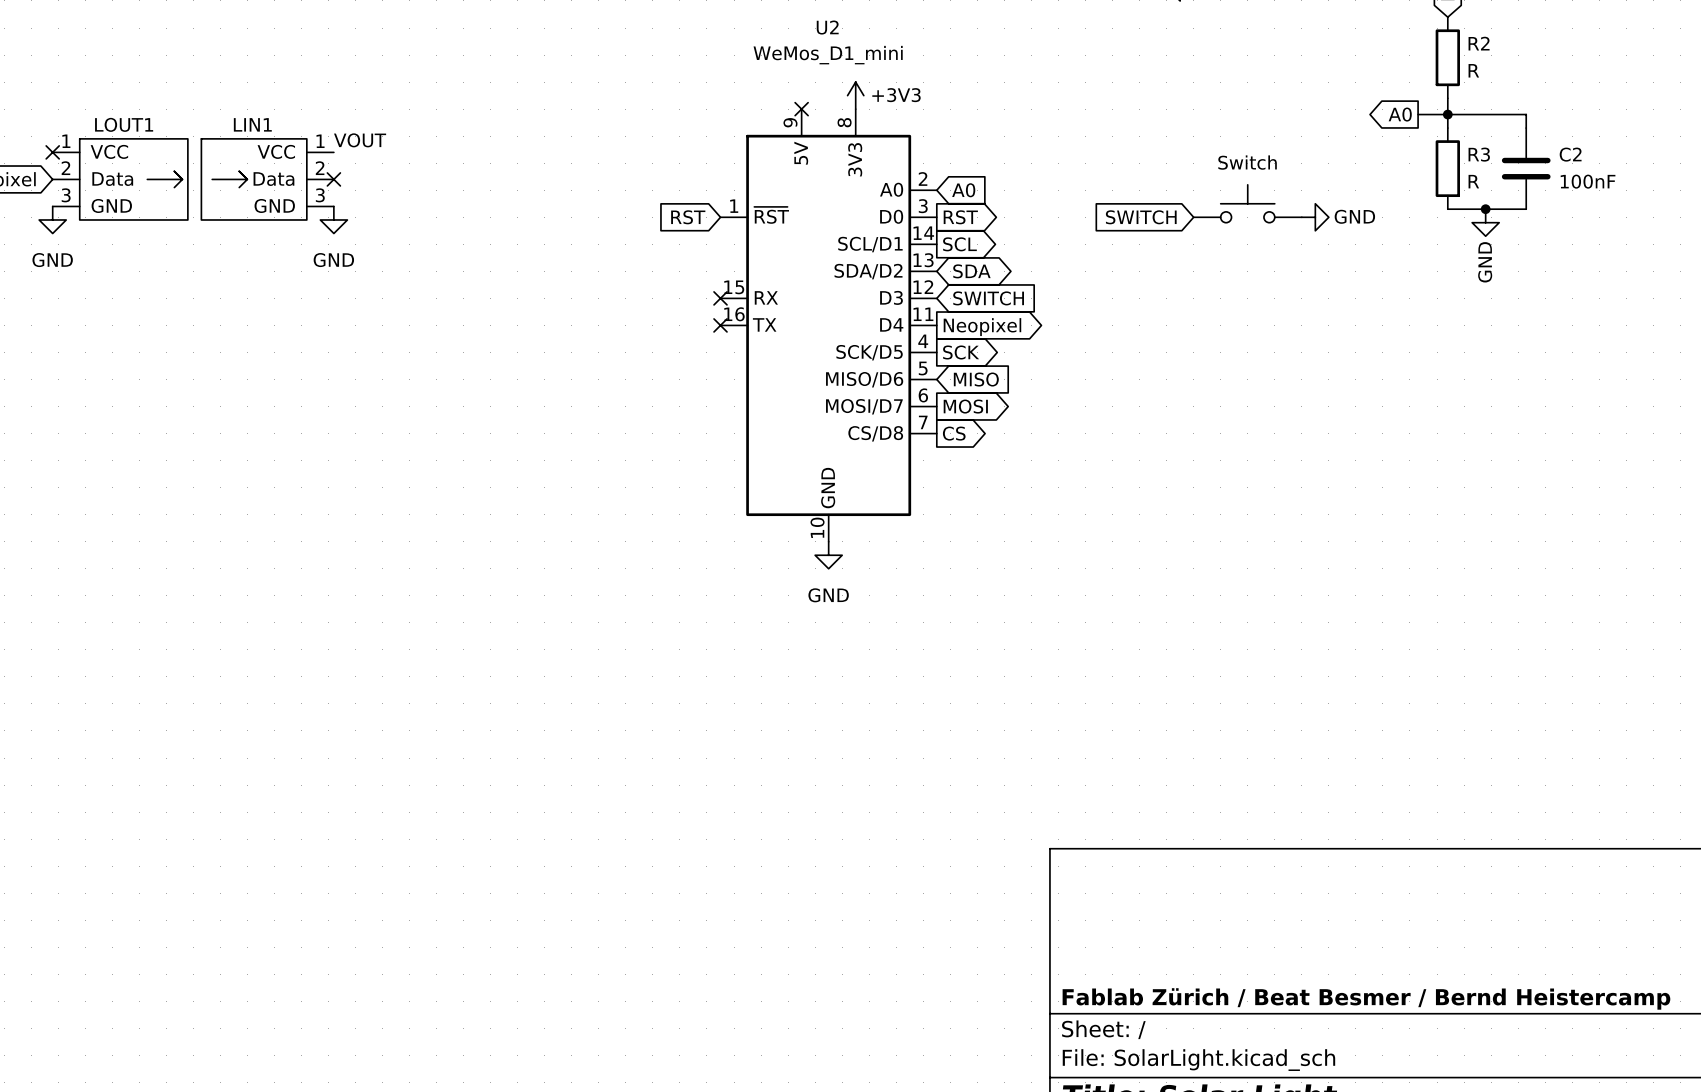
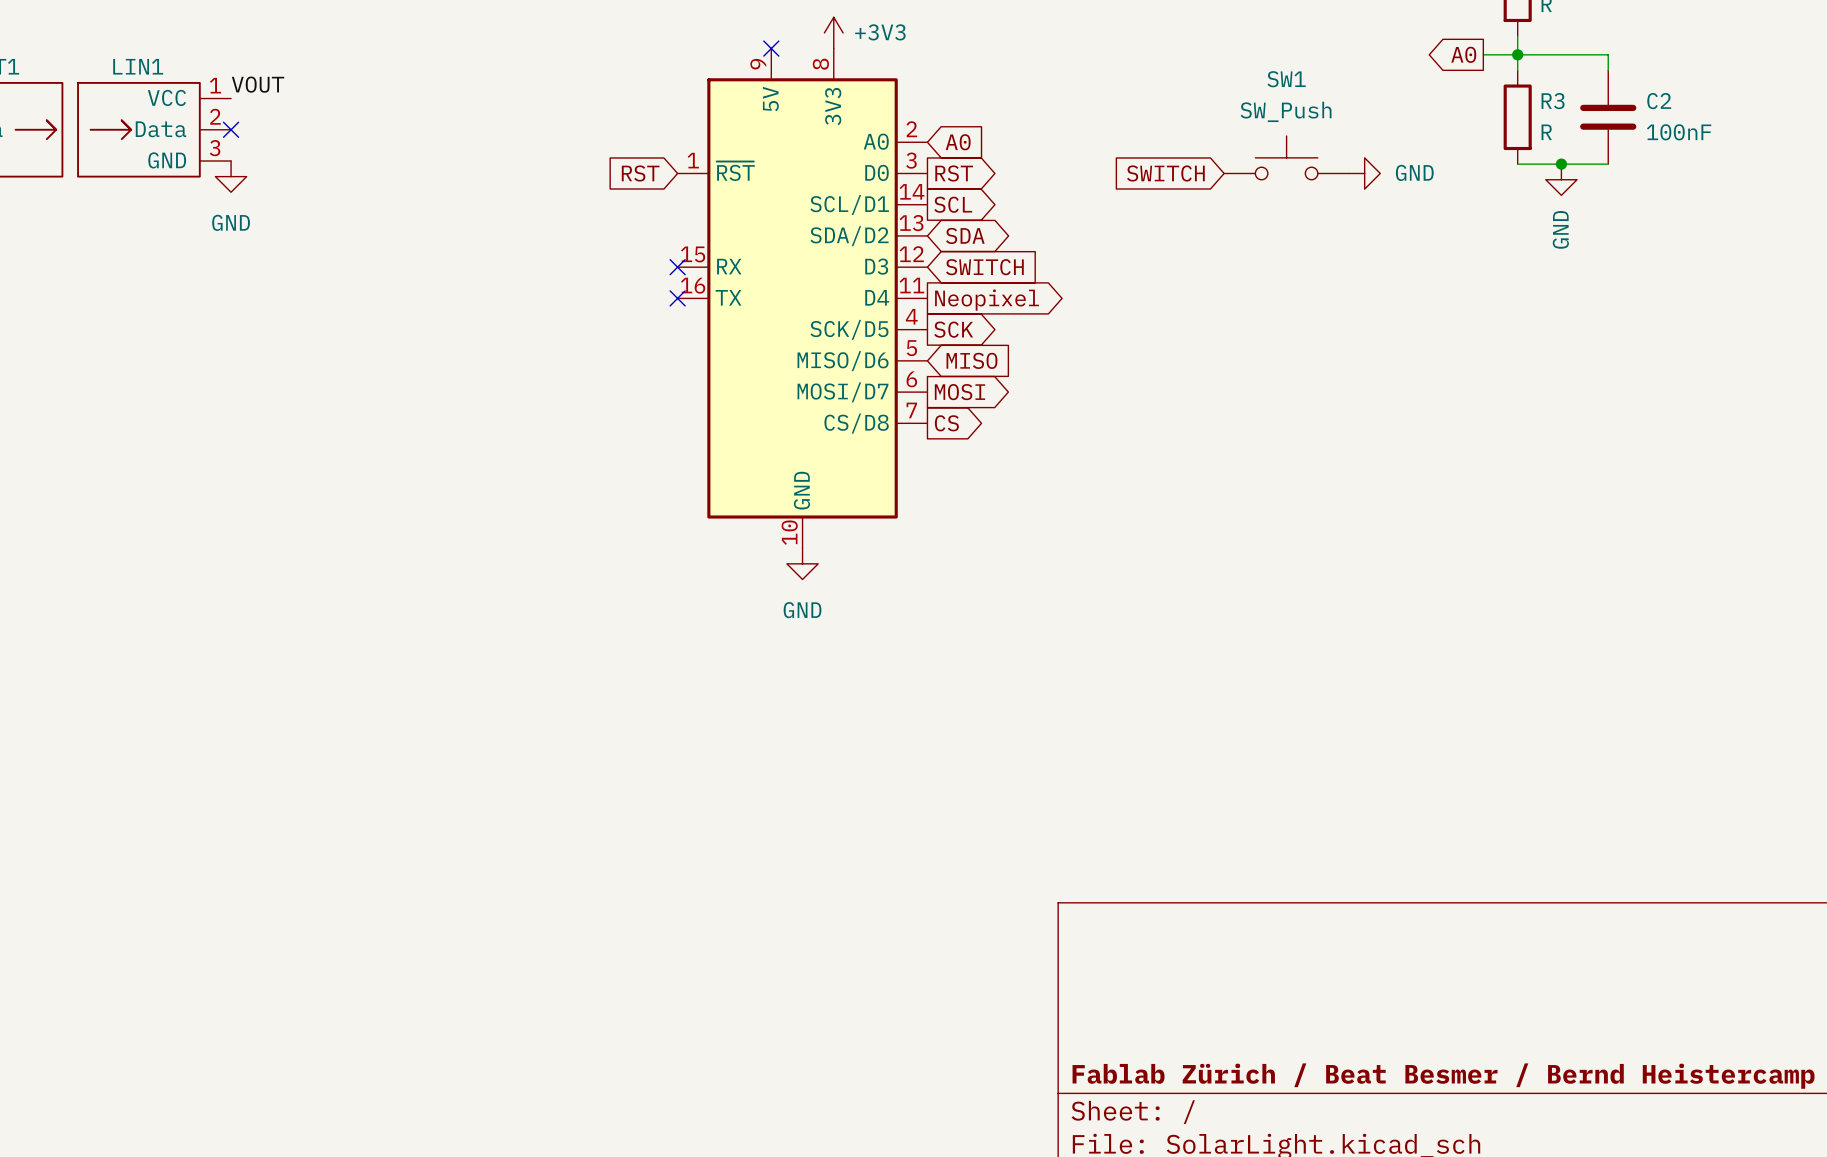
SW1 name: none -> SW1 (1286, 79)
SW1 value: Switch (1247, 162) -> SW_Push (1286, 111)

